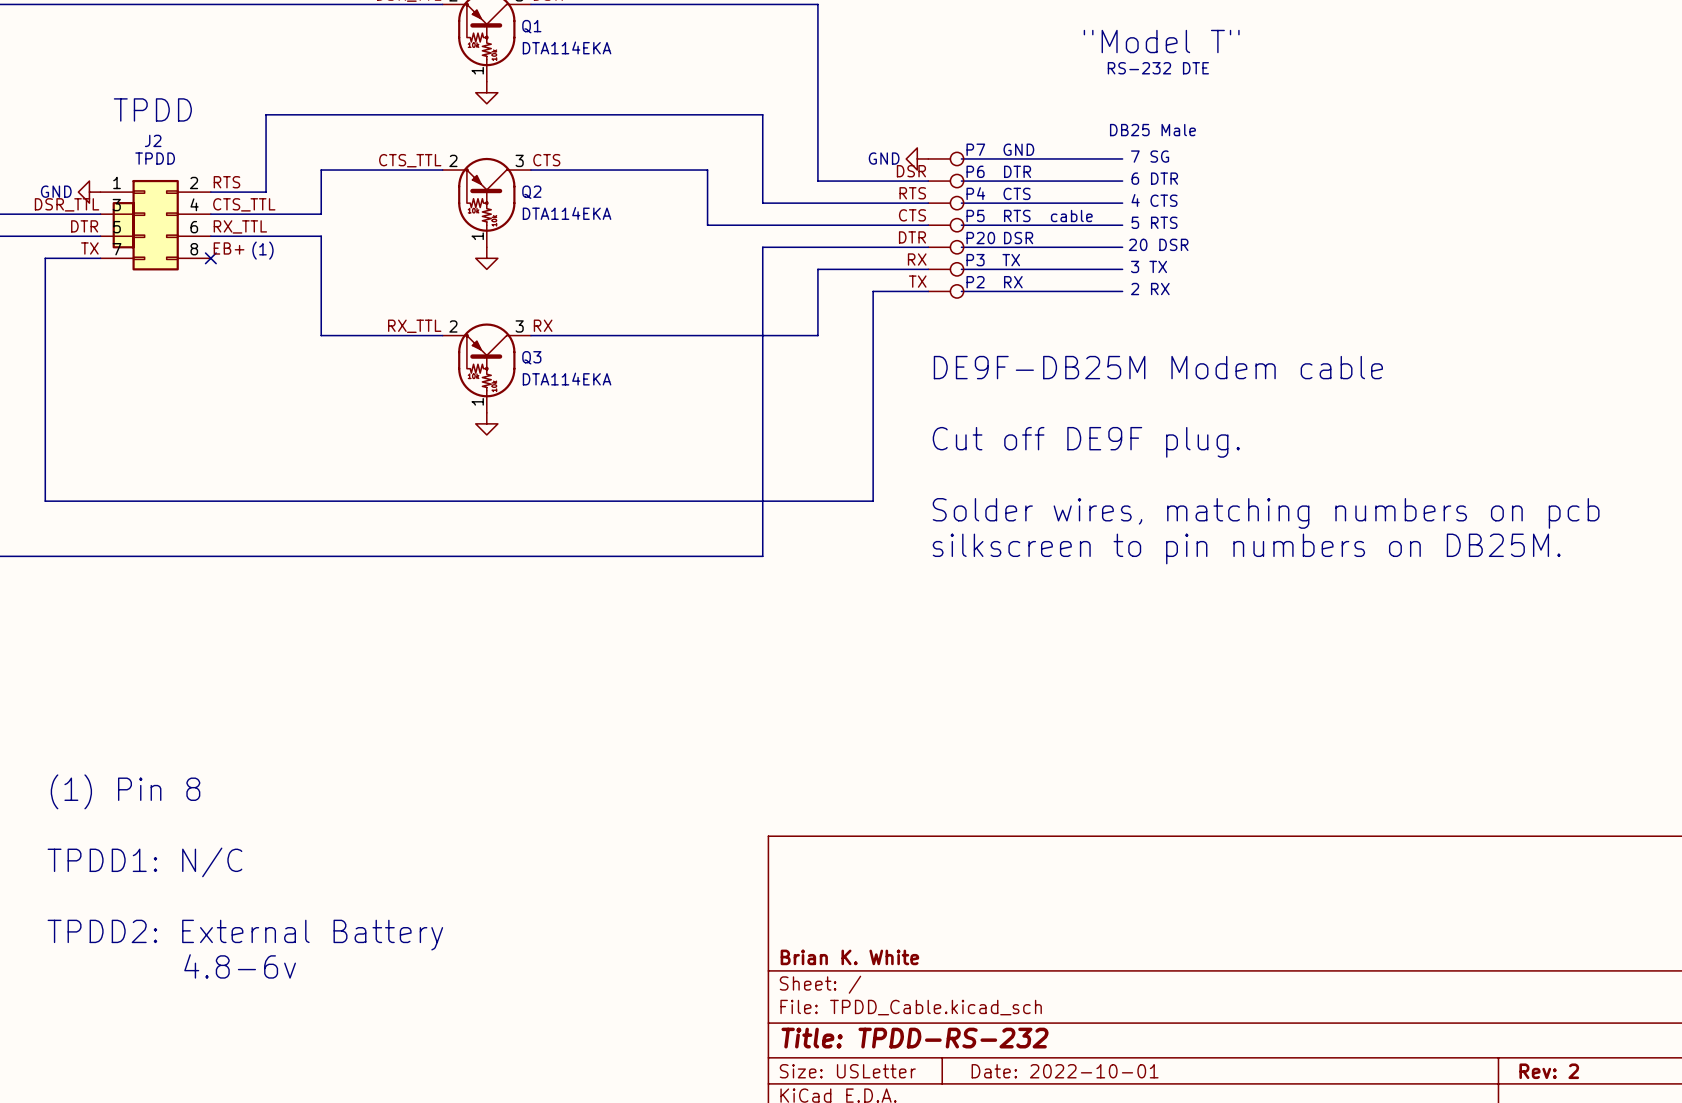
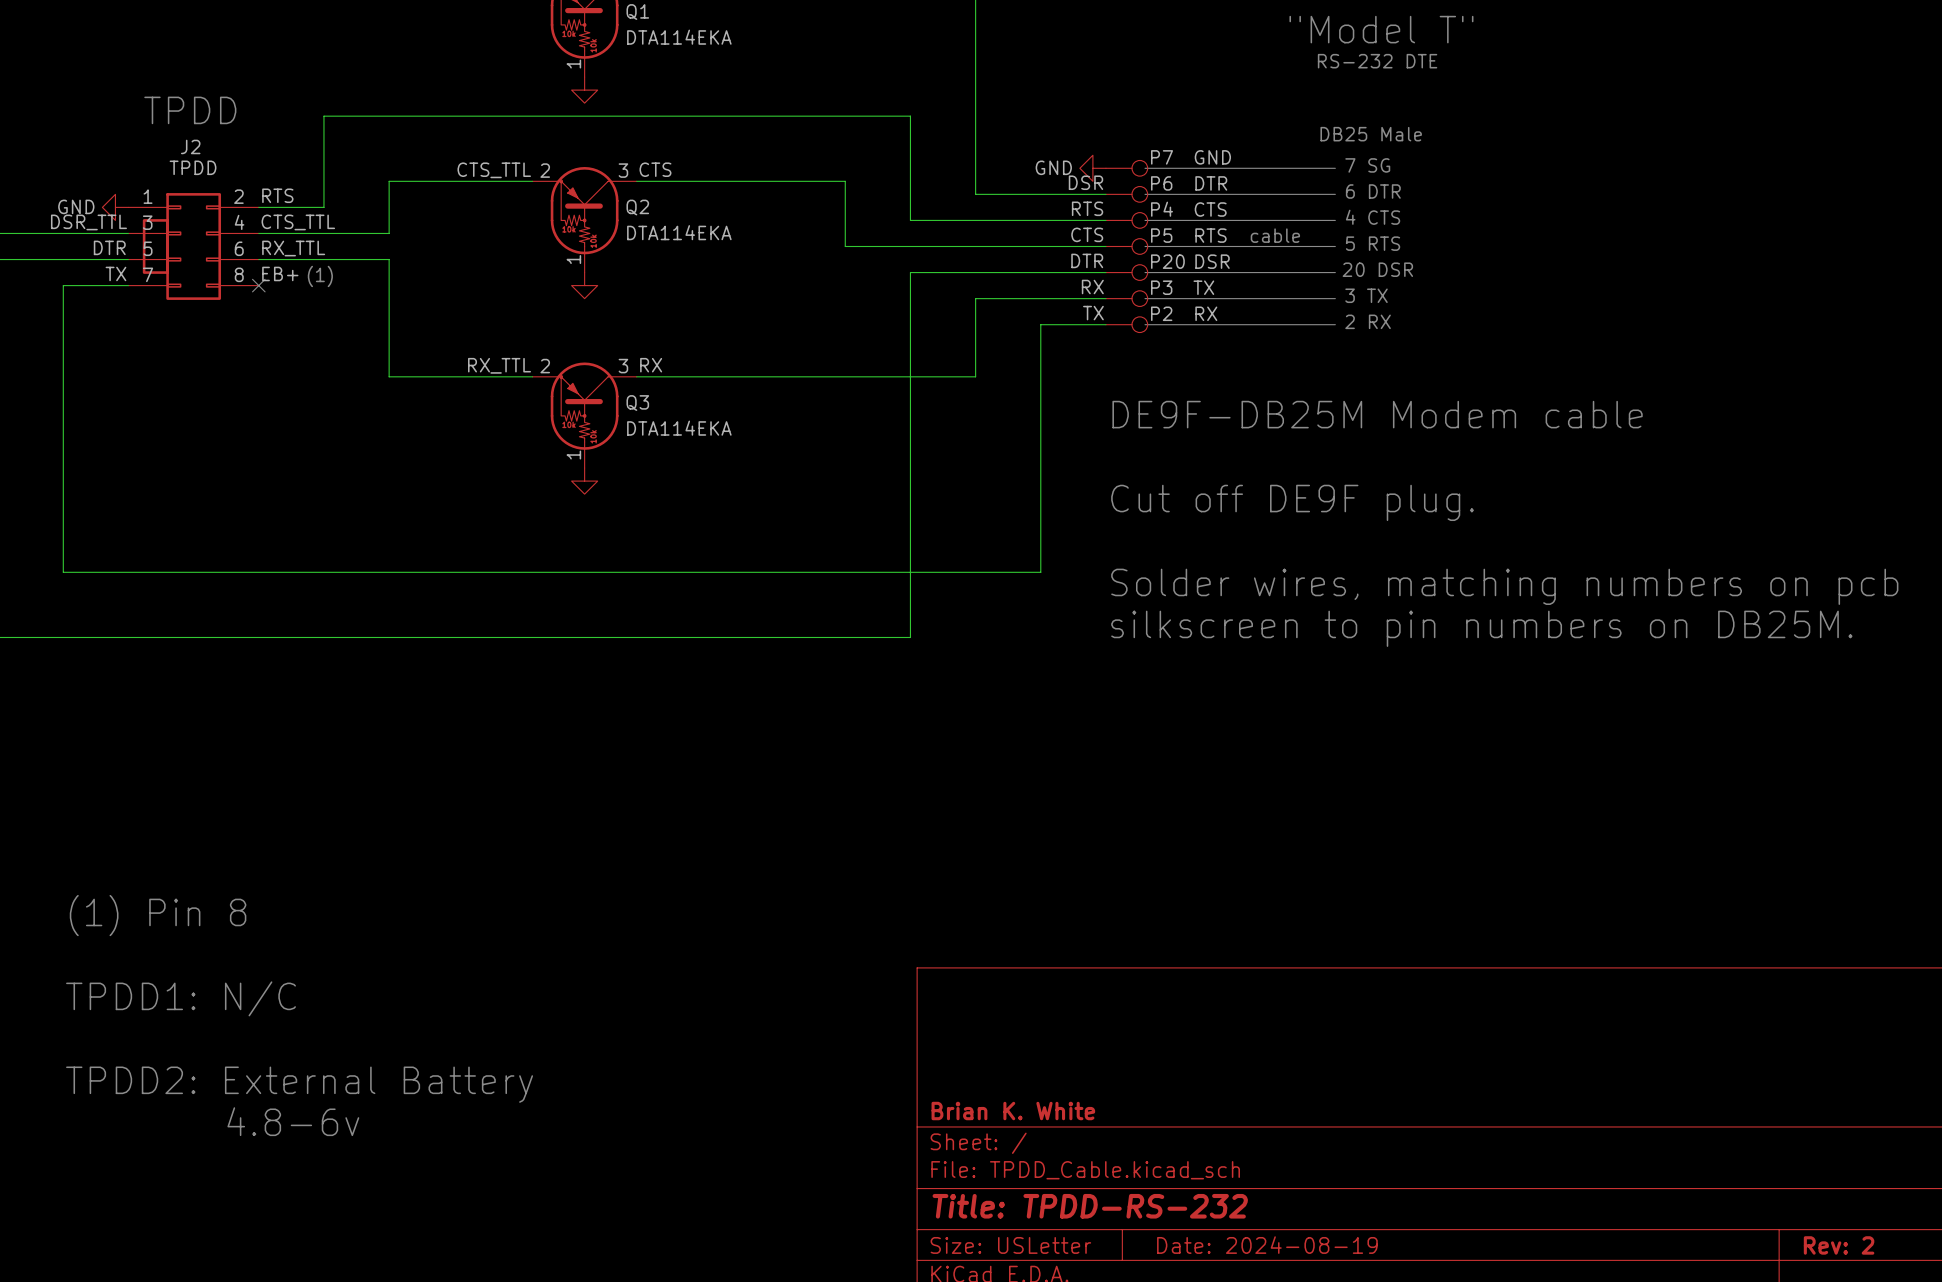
title block: Date: 2022-10-01 (1065, 1071) -> Date: 2024-08-19 (1267, 1245)

